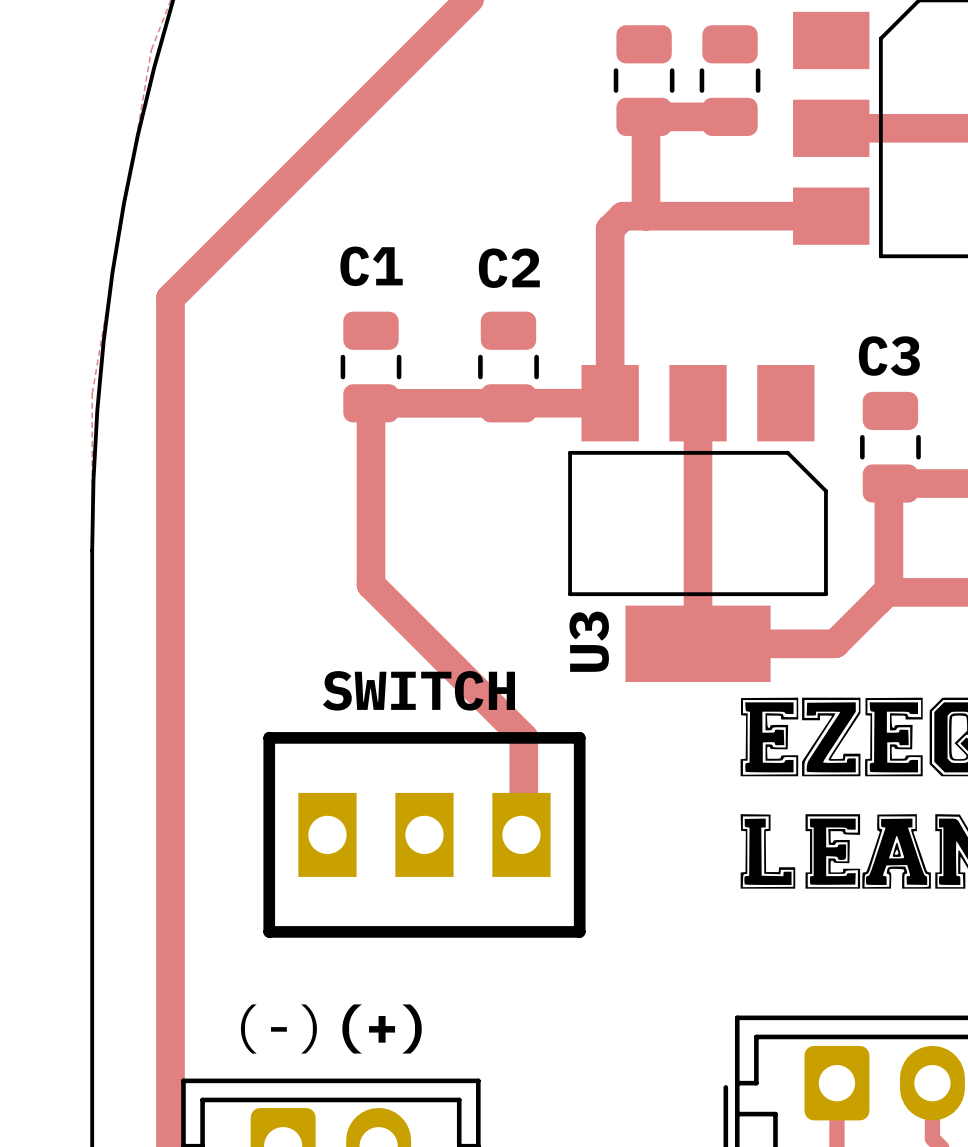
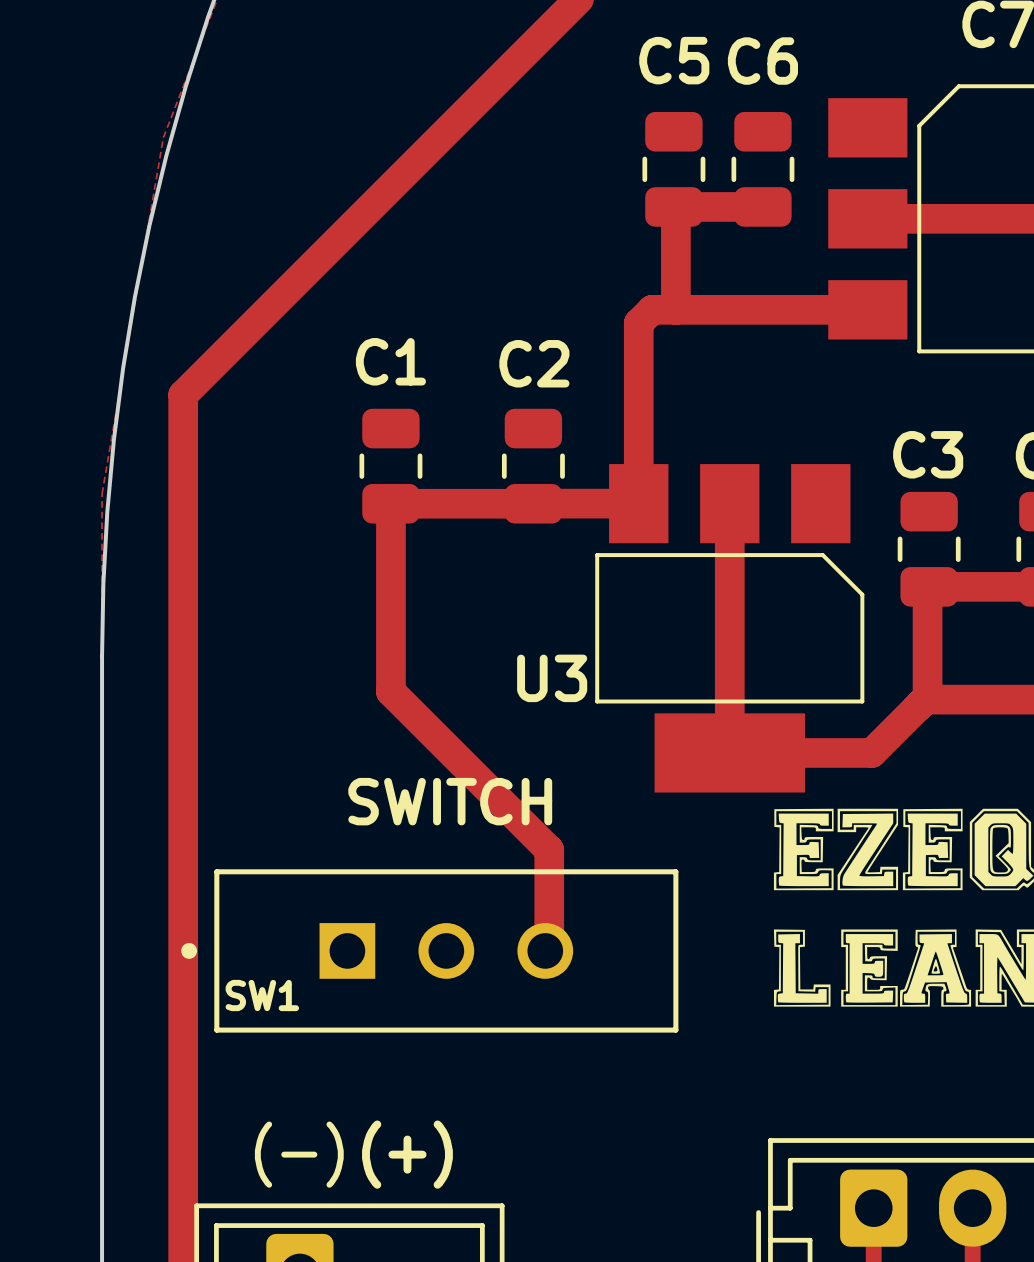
U3 name rotation: 0° (589, 641) -> 90° clockwise (552, 678)
SW1: none -> (429, 950)
part: (424, 834) -> none

